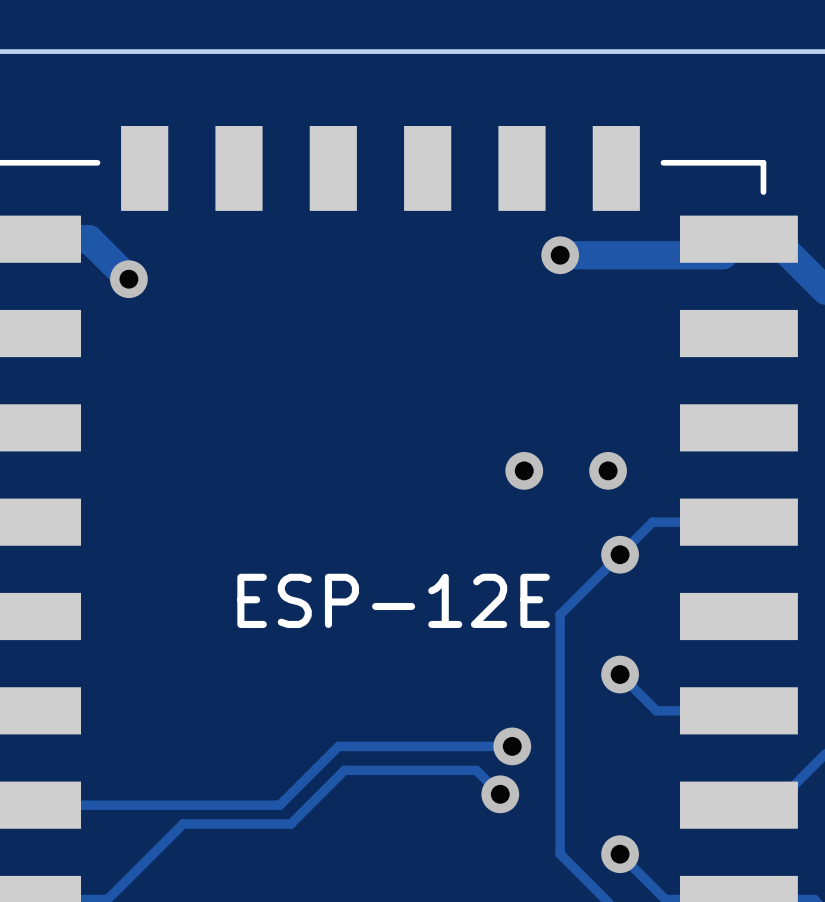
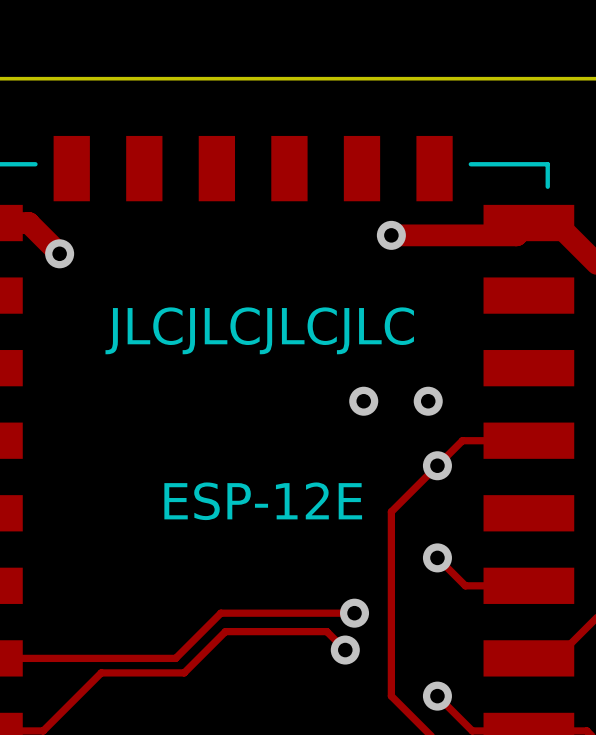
text: none -> JLCJLCJLCJLC (259, 330)

